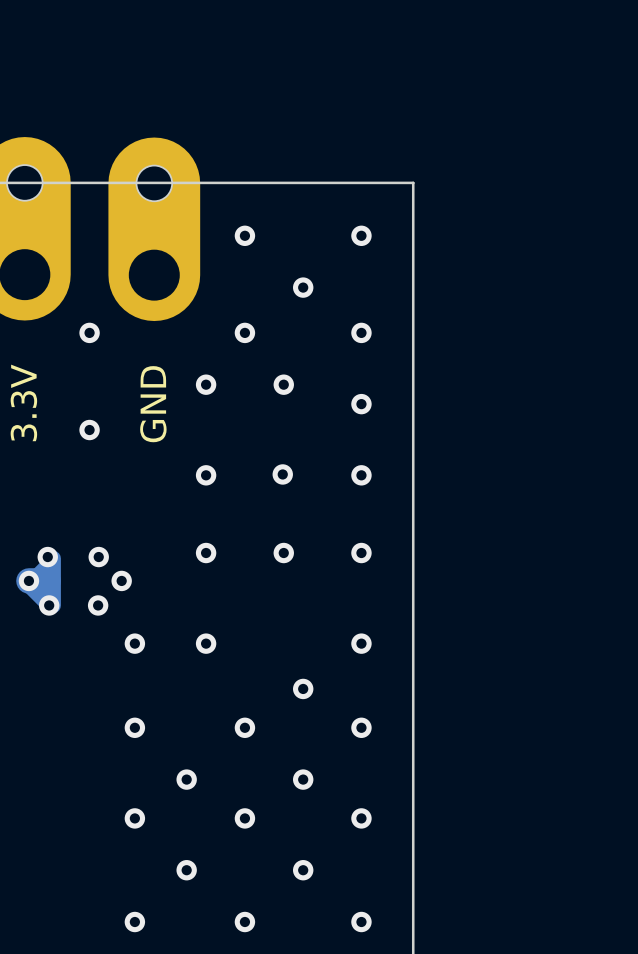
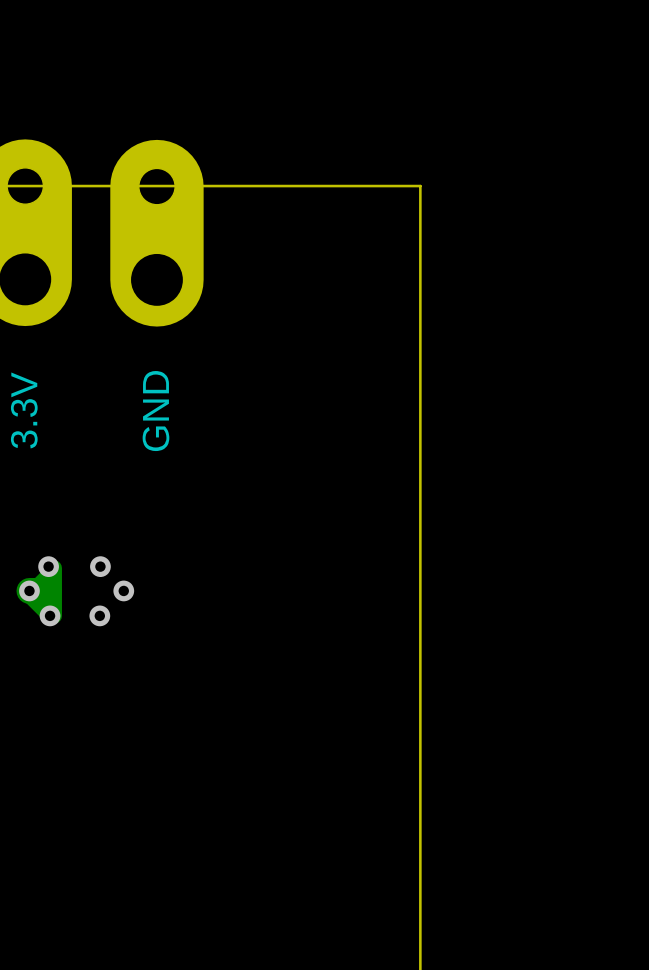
via: (244, 235) -> none
via: (361, 235) -> none
via: (303, 287) -> none
via: (89, 332) -> none
via: (244, 332) -> none
via: (361, 332) -> none
via: (206, 384) -> none
via: (283, 384) -> none
via: (361, 404) -> none
via: (89, 430) -> none
via: (282, 474) -> none
via: (206, 475) -> none
via: (361, 475) -> none
via: (206, 553) -> none
via: (283, 553) -> none
via: (361, 553) -> none
via: (134, 643) -> none
via: (206, 643) -> none
via: (361, 643) -> none
via: (303, 688) -> none
via: (134, 727) -> none
via: (244, 727) -> none
via: (361, 727) -> none
via: (186, 779) -> none
via: (303, 779) -> none
via: (134, 818) -> none
via: (244, 818) -> none
via: (361, 818) -> none
via: (186, 870) -> none
via: (303, 870) -> none
via: (134, 922) -> none
via: (244, 922) -> none
via: (361, 922) -> none

